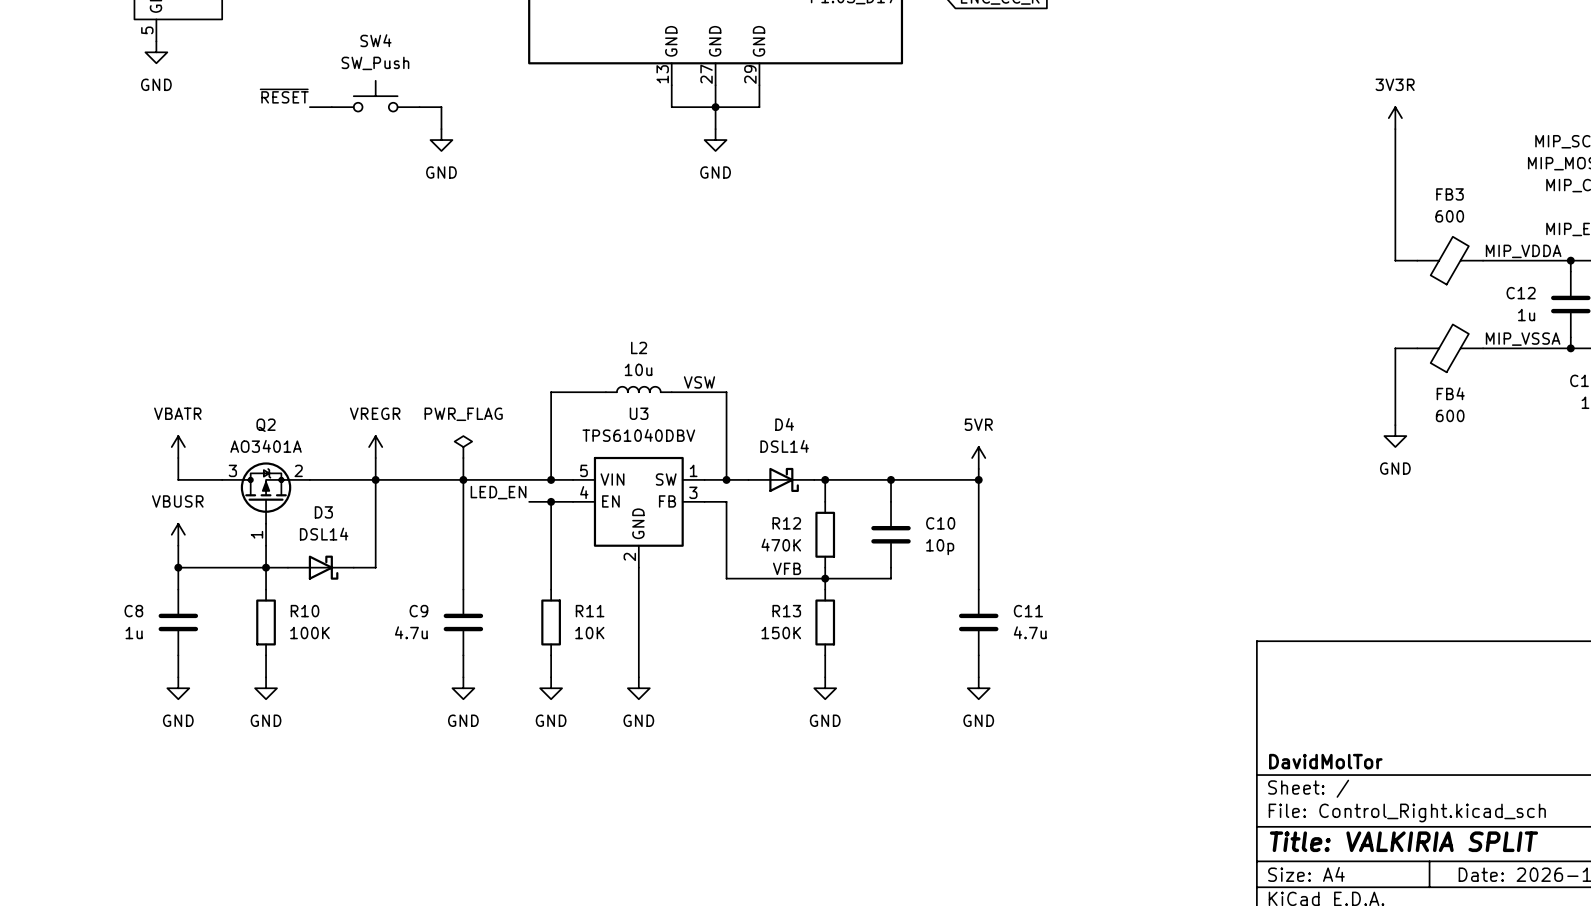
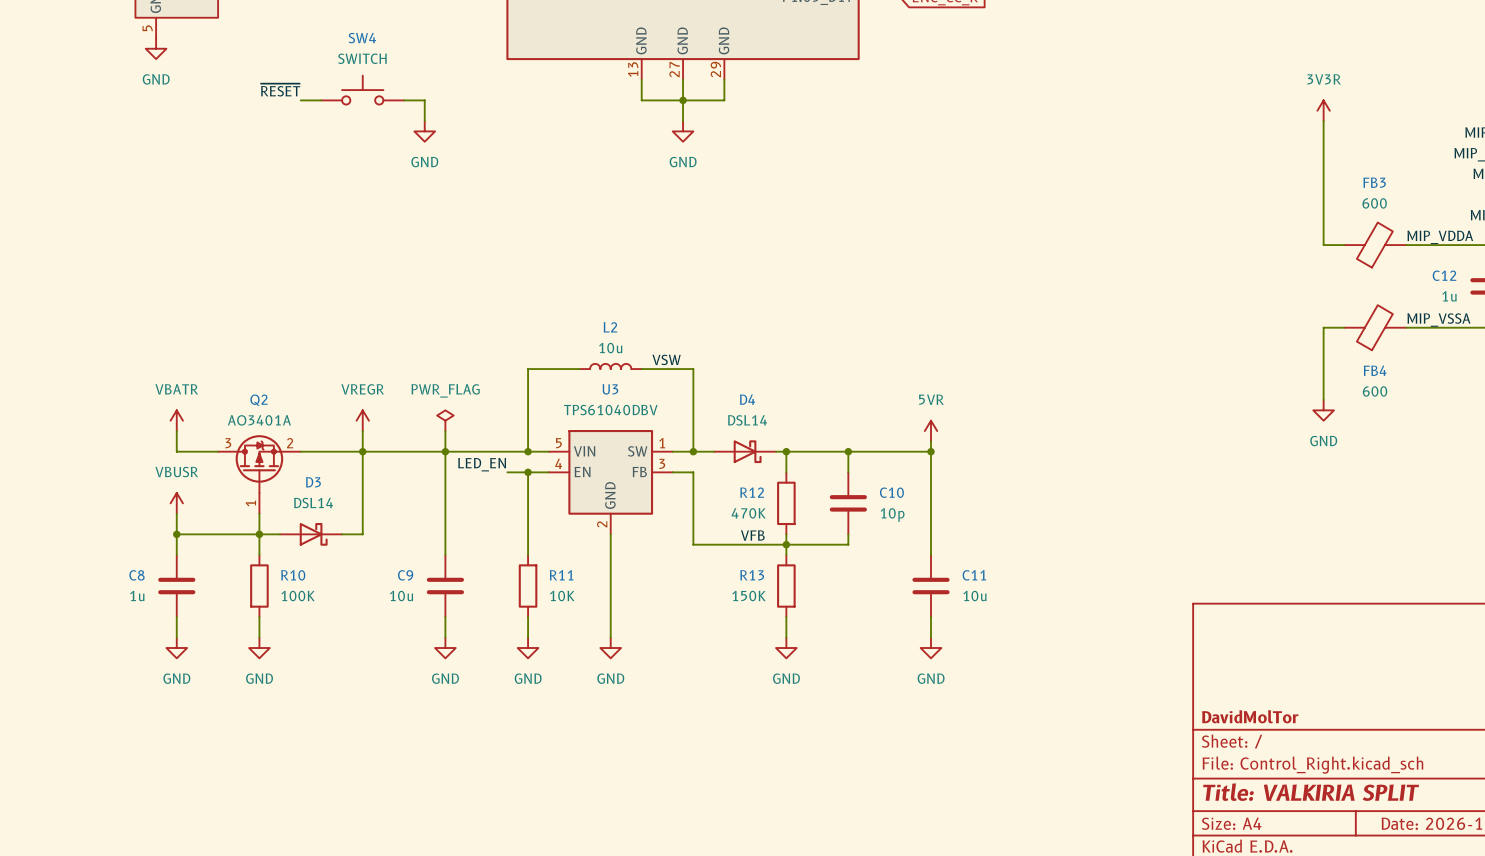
SW4 value: SW_Push (375, 63) -> SWITCH (362, 58)
C9 value: 4.7u (411, 632) -> 10u (401, 596)
C11 value: 4.7u (1030, 632) -> 10u (974, 596)

